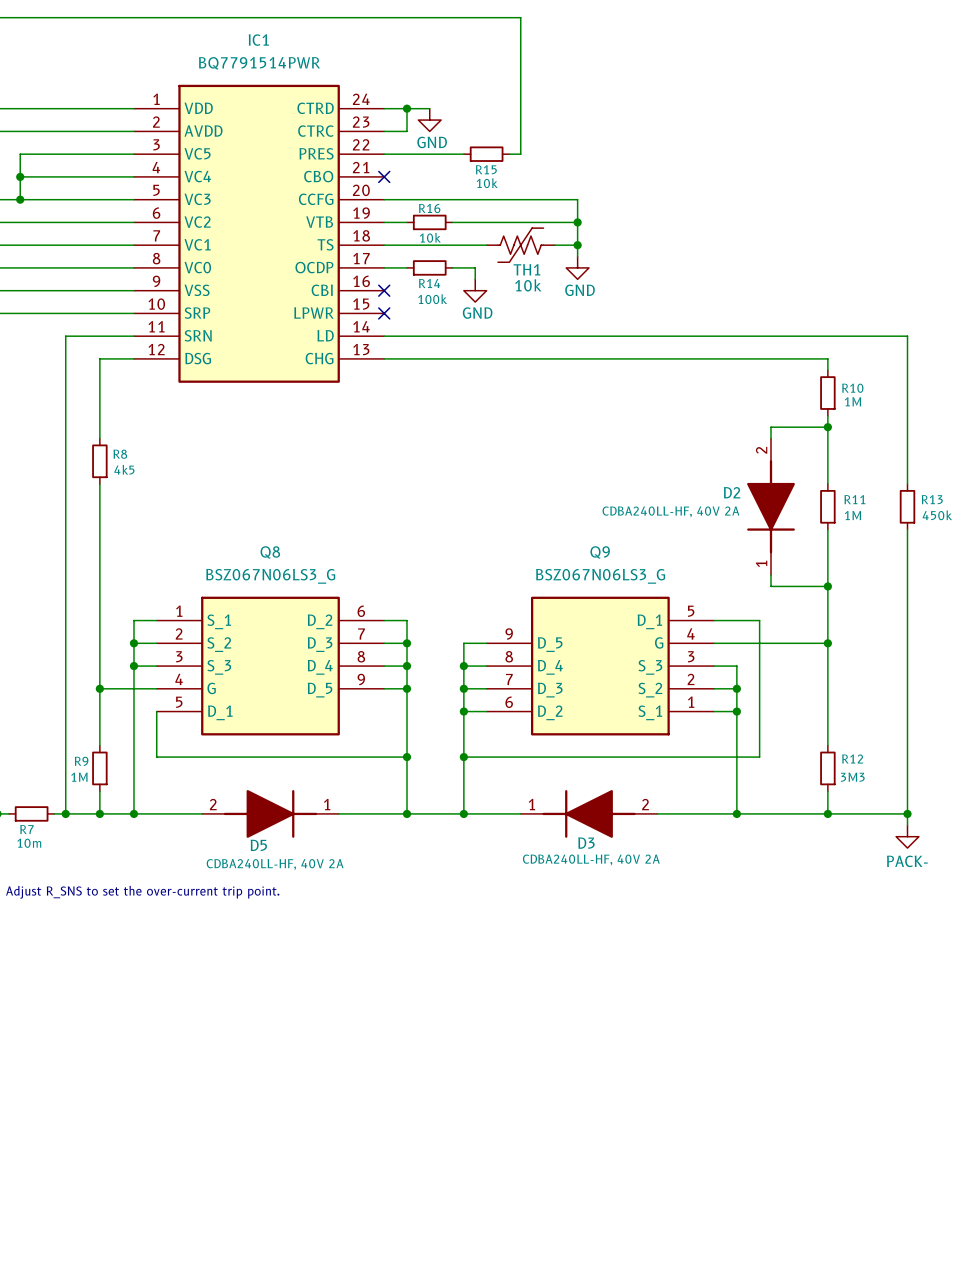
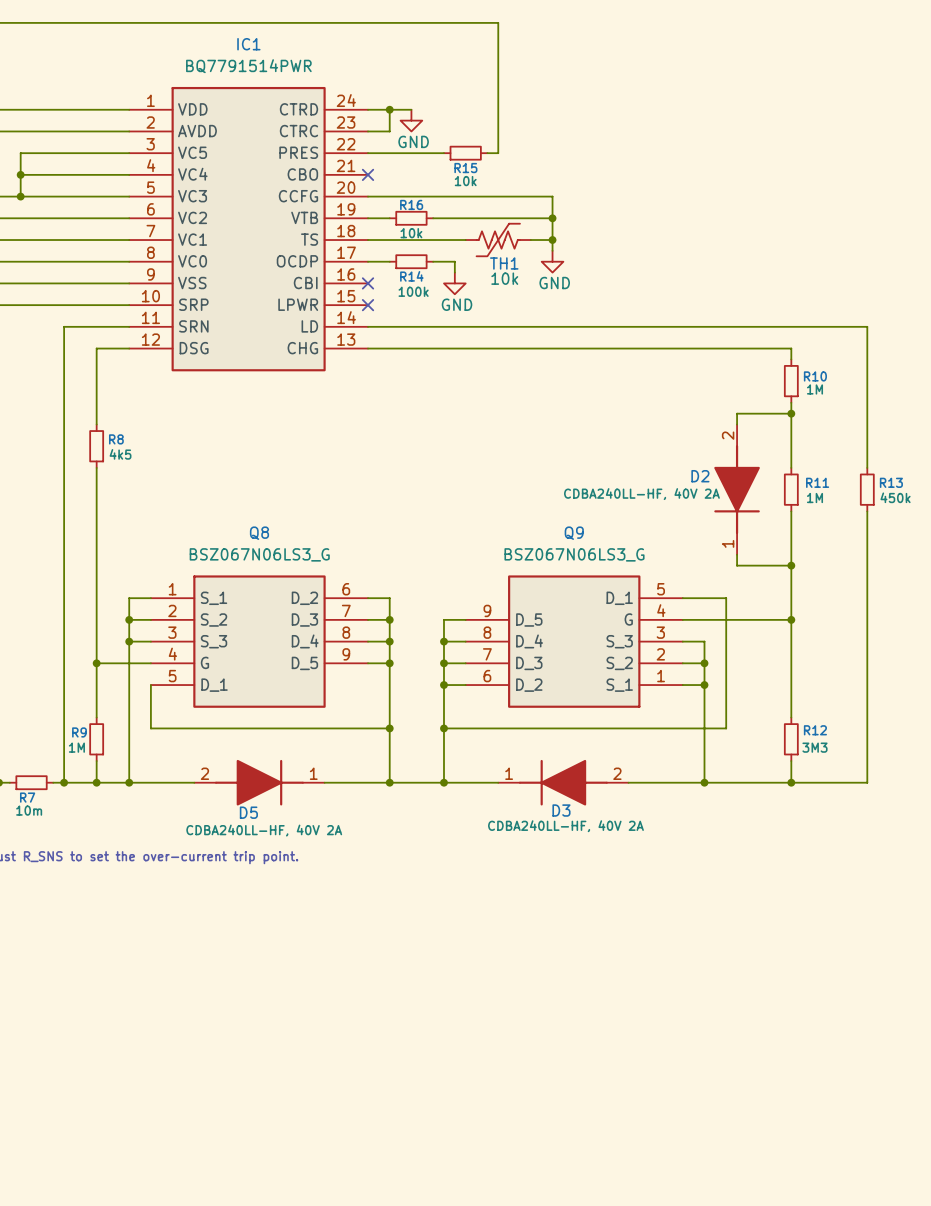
wire: (907, 813) (907, 825) -> none
junction: (907, 813) -> none
power symbol: PACK- (907, 836) -> none

